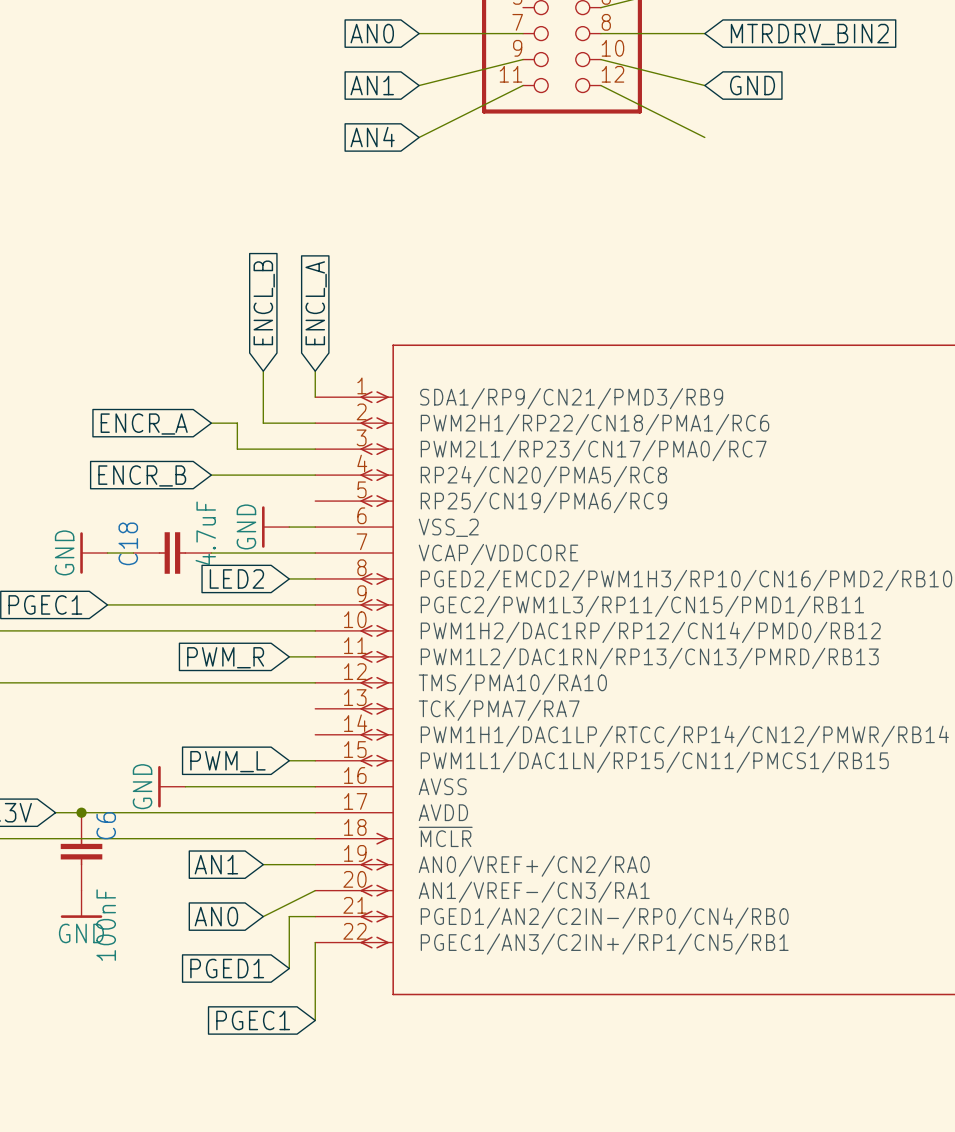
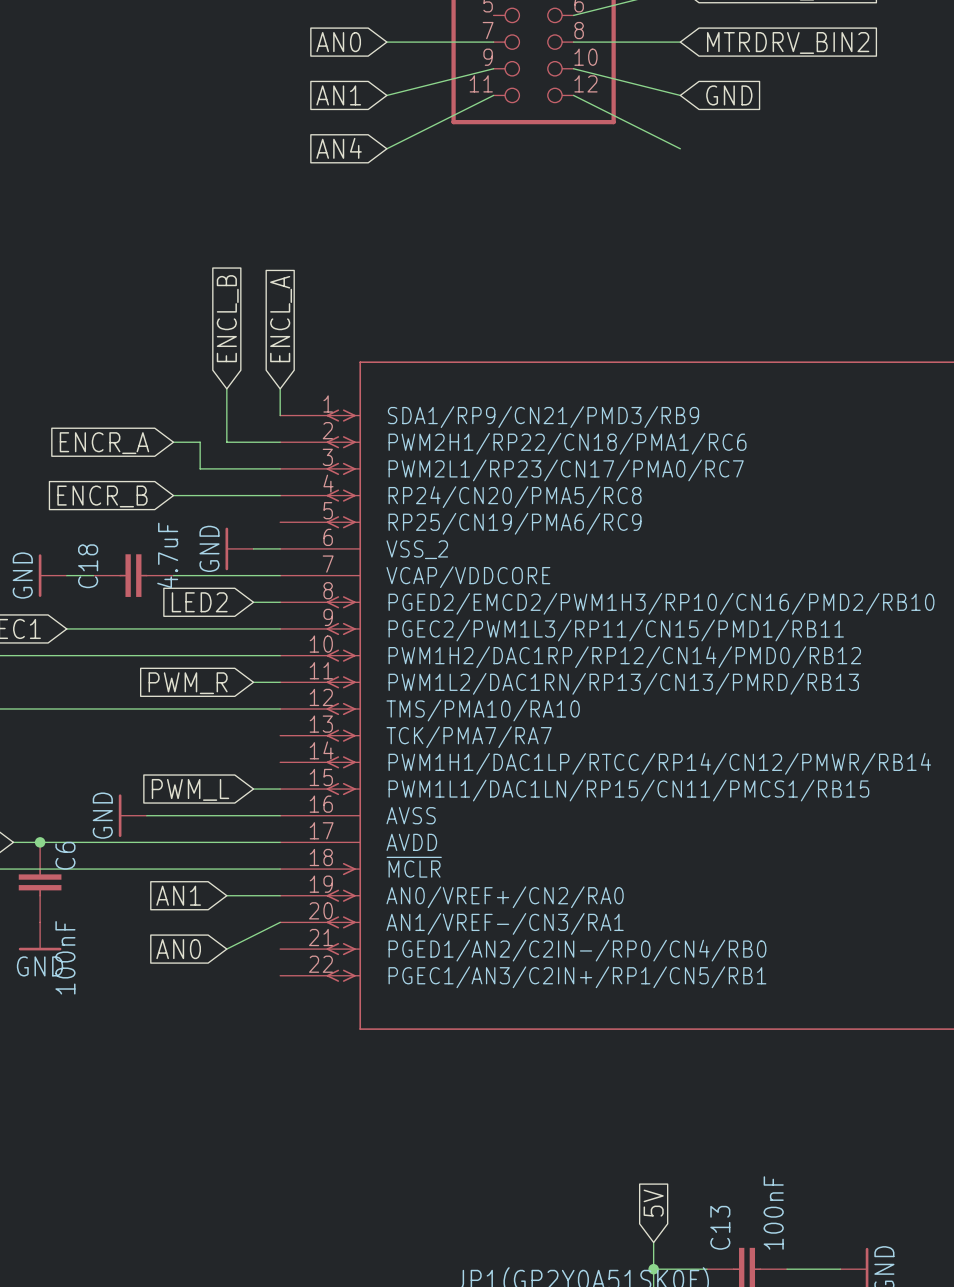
wire: (315, 916) (289, 916) (289, 968) -> none
wire: (315, 942) (315, 1020) -> none
global label: PGED1 (227, 968) -> none
global label: PGEC1 (253, 1020) -> none

